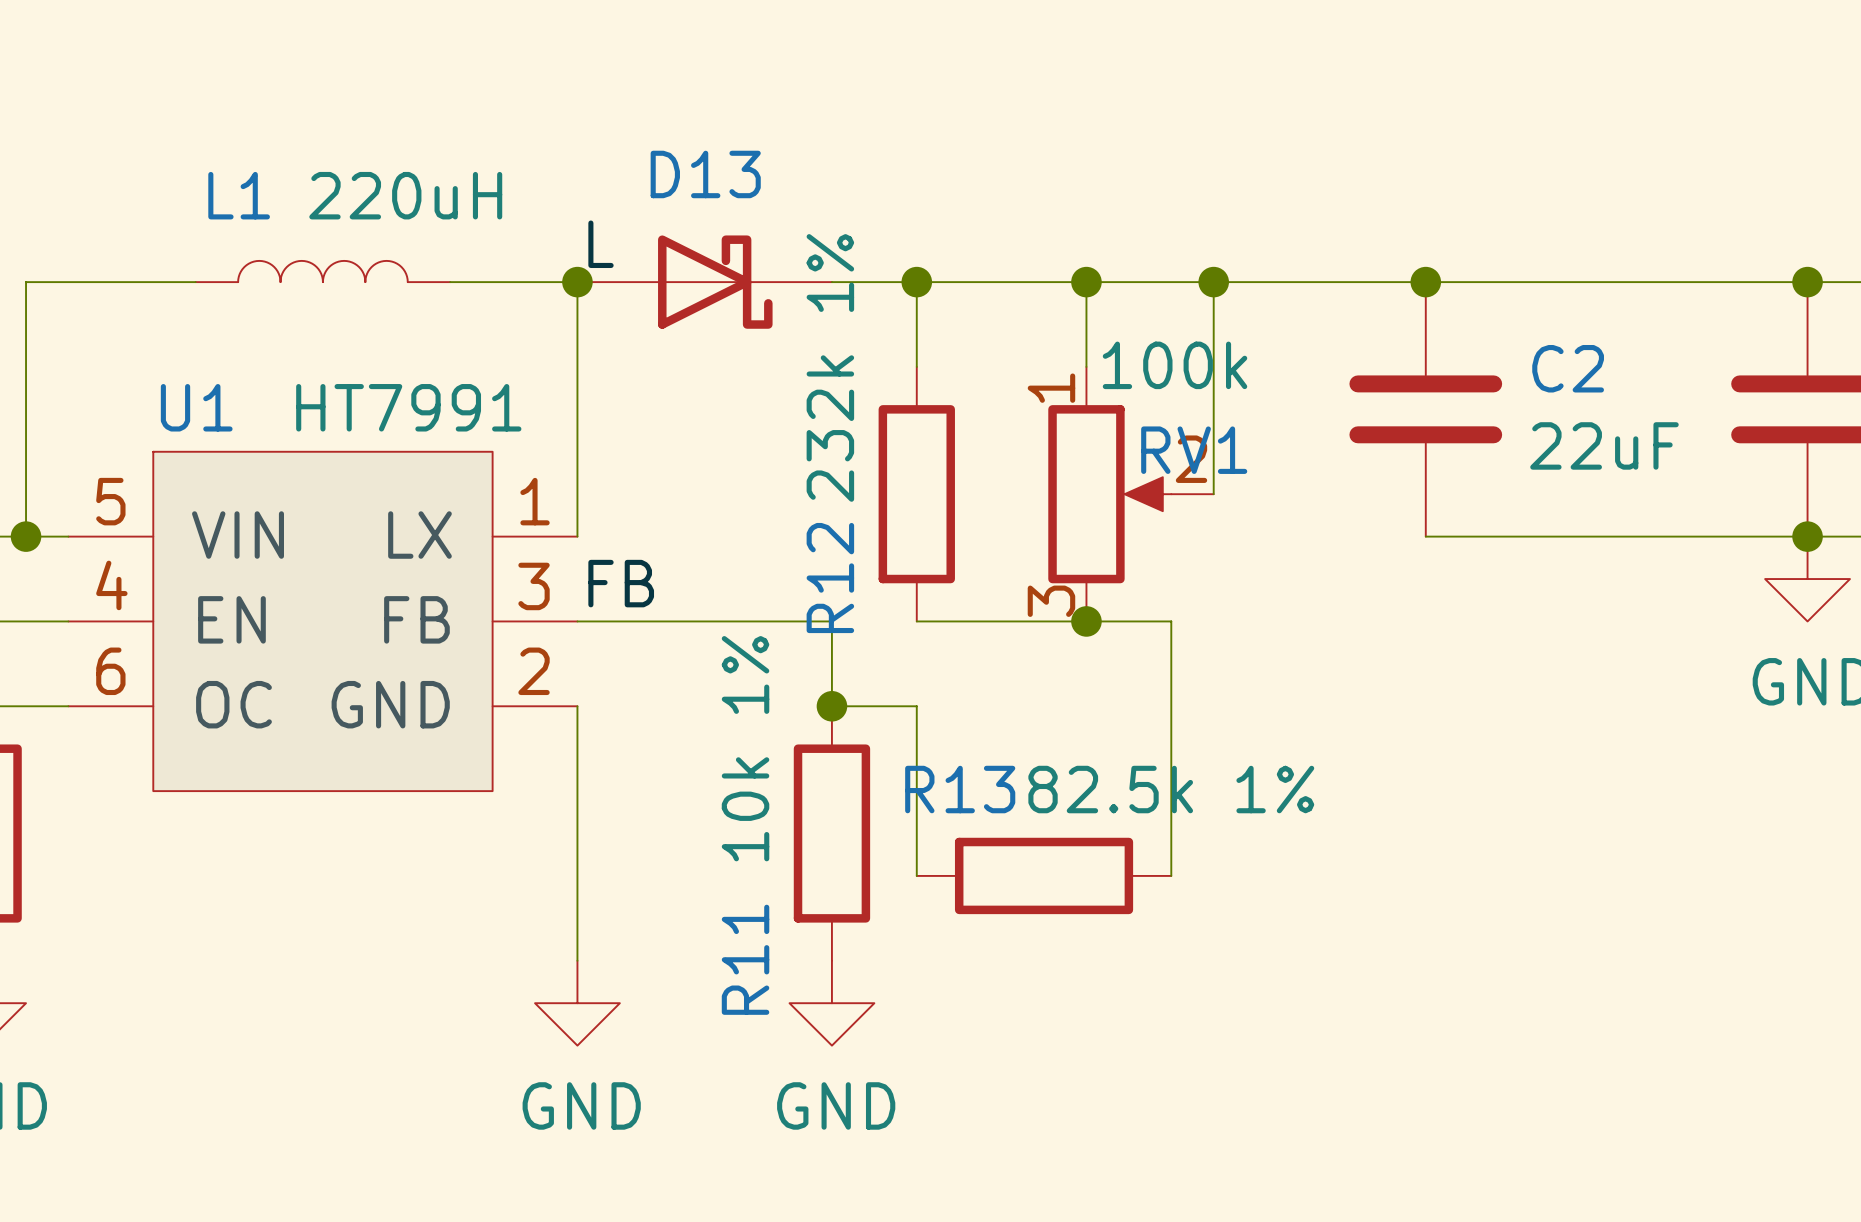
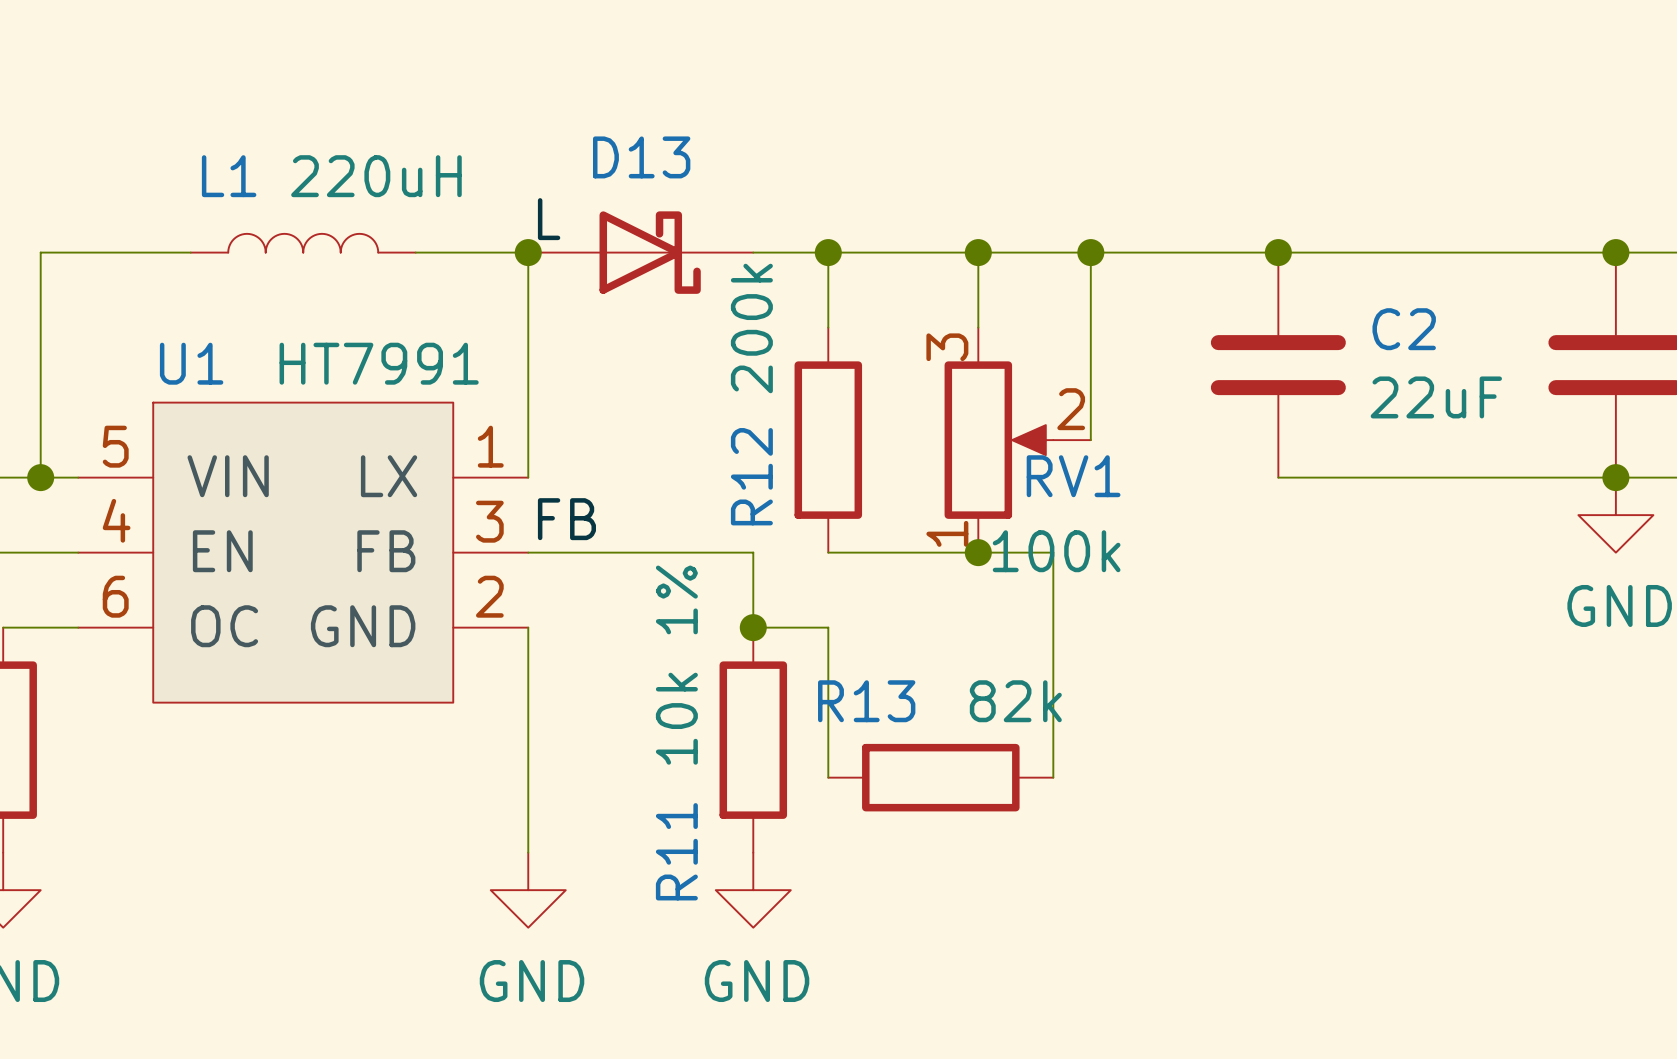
R12 value: 232k 1% (830, 367) -> 200k (751, 328)
RV1 flip: as is (1109, 494) -> up-down (998, 440)
R12 name position: R12 (830, 578) -> R12 (751, 476)
R13 value: 82.5k 1% (1171, 789) -> 82k (1015, 701)

